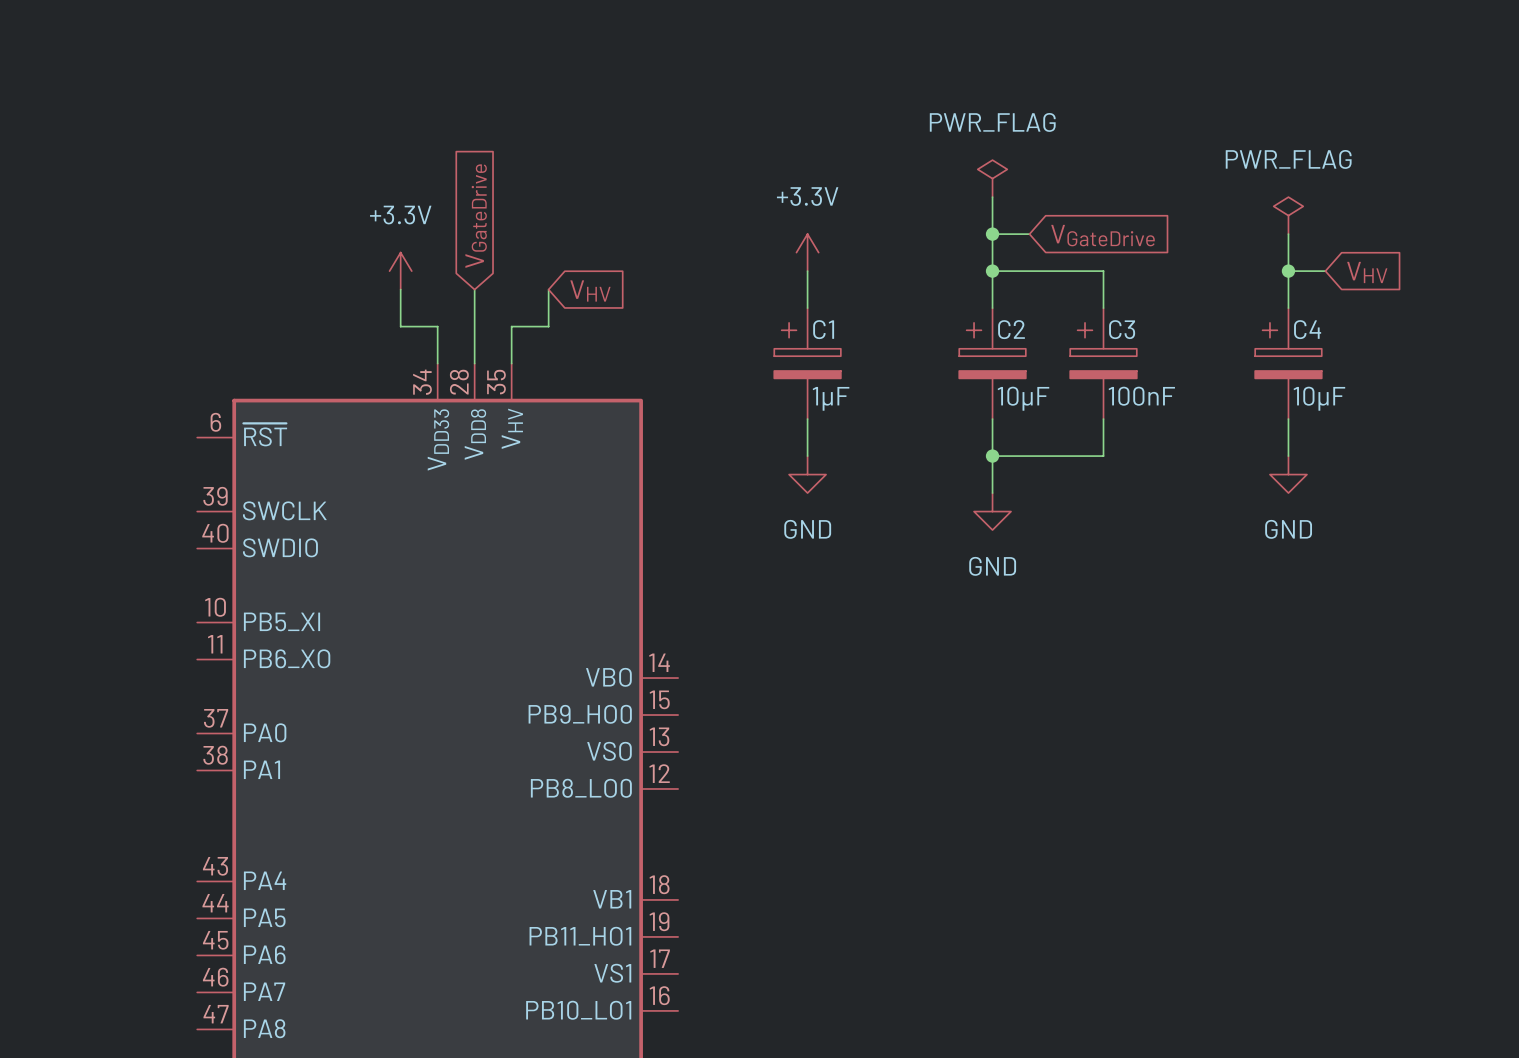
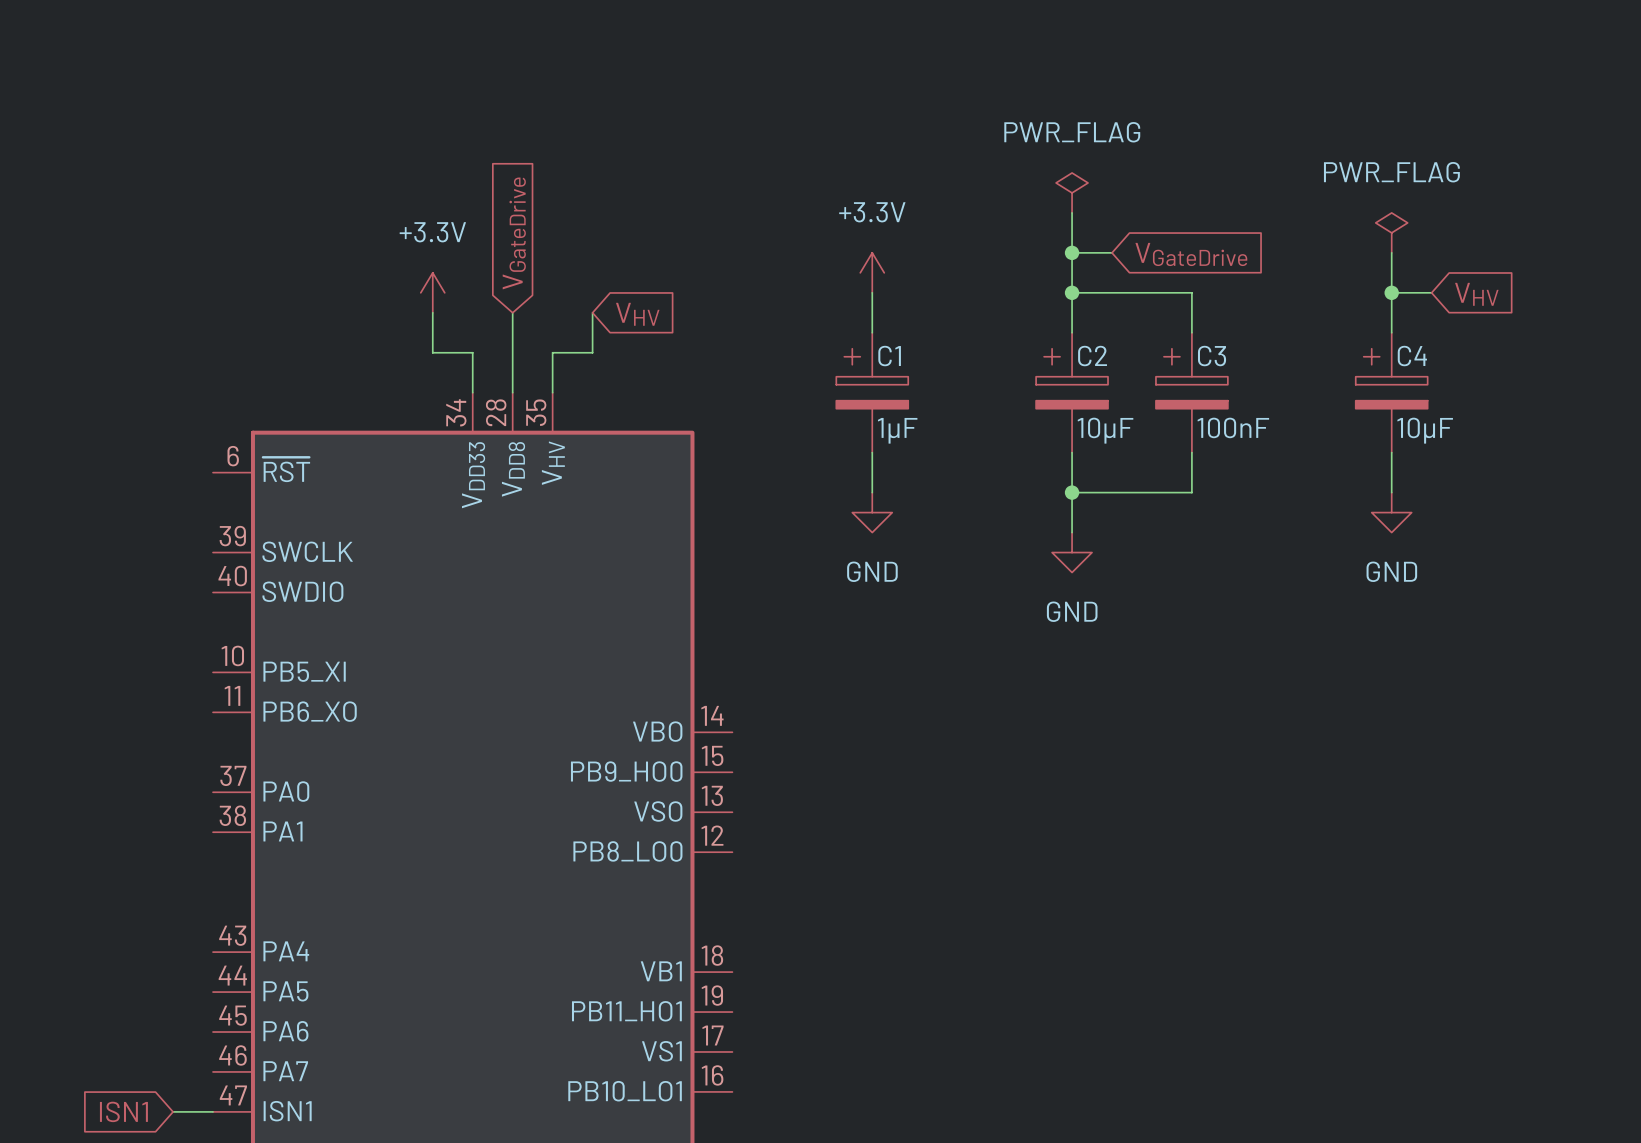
part pin name: PA8 (264, 1028) -> ISN1 (287, 1111)
global label: none -> ISN1 (123, 1111)
wire: none -> (173, 1111) (213, 1111)

